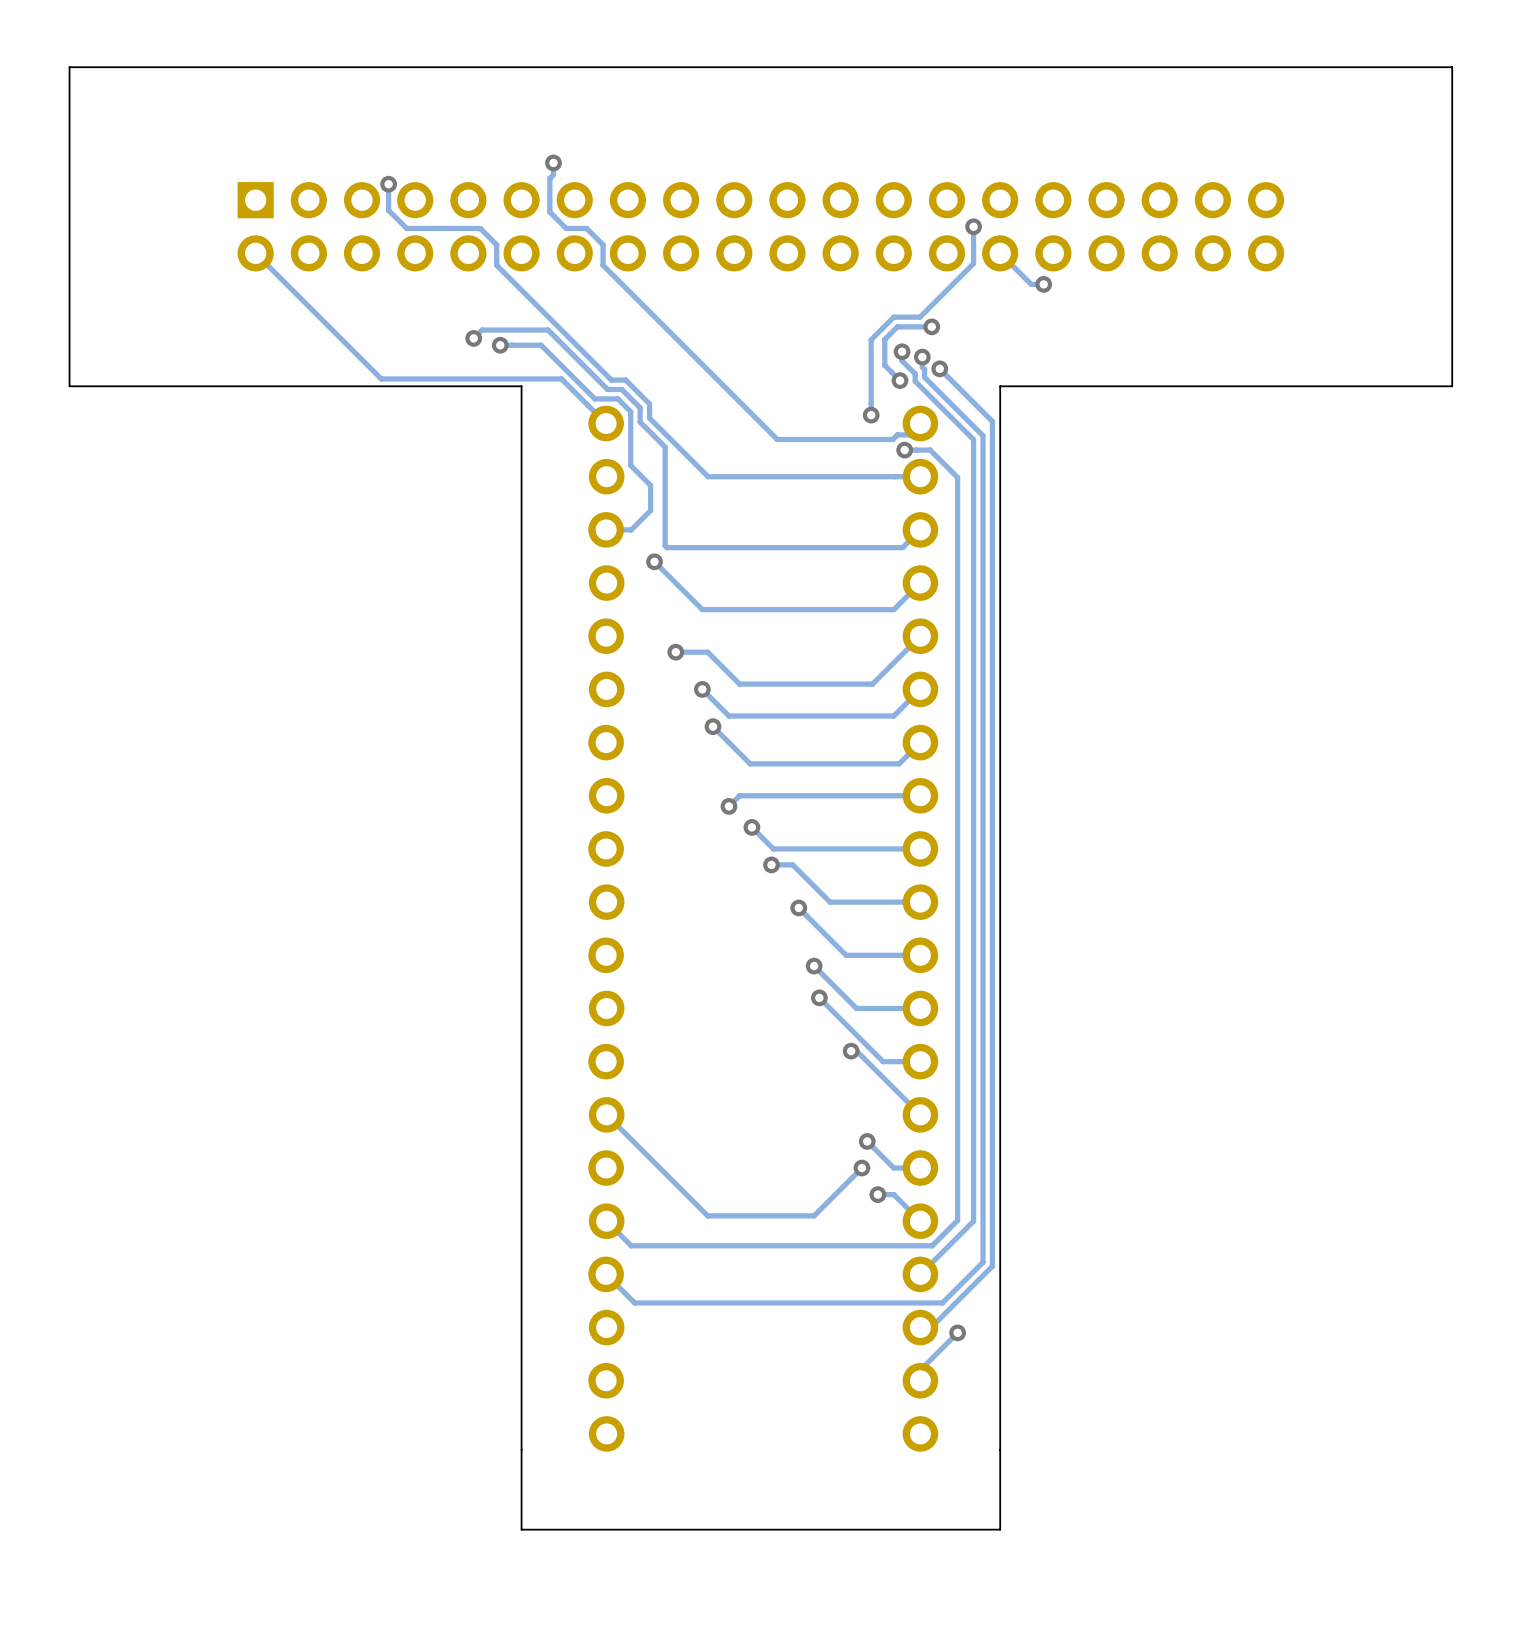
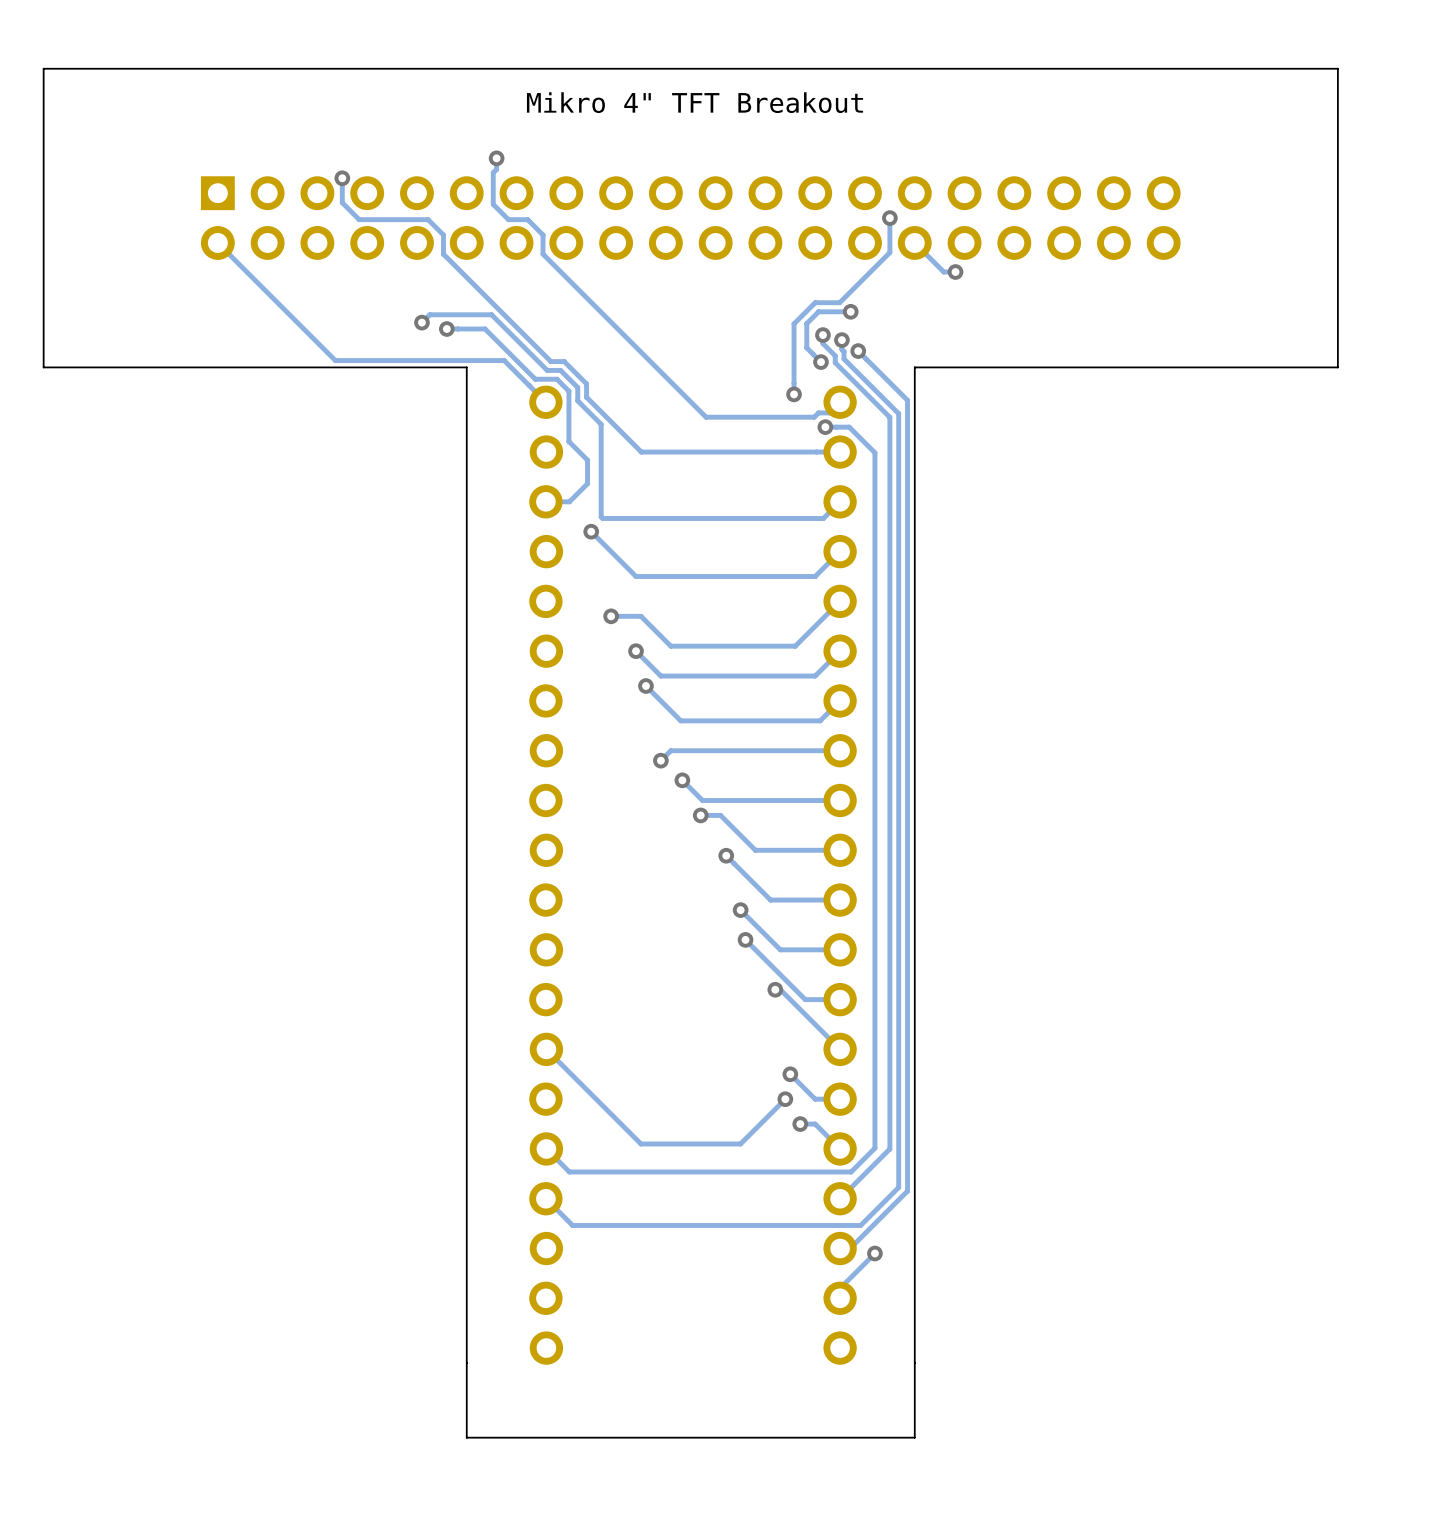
text: none -> Mikro 4" TFT Breakout (694, 102)

